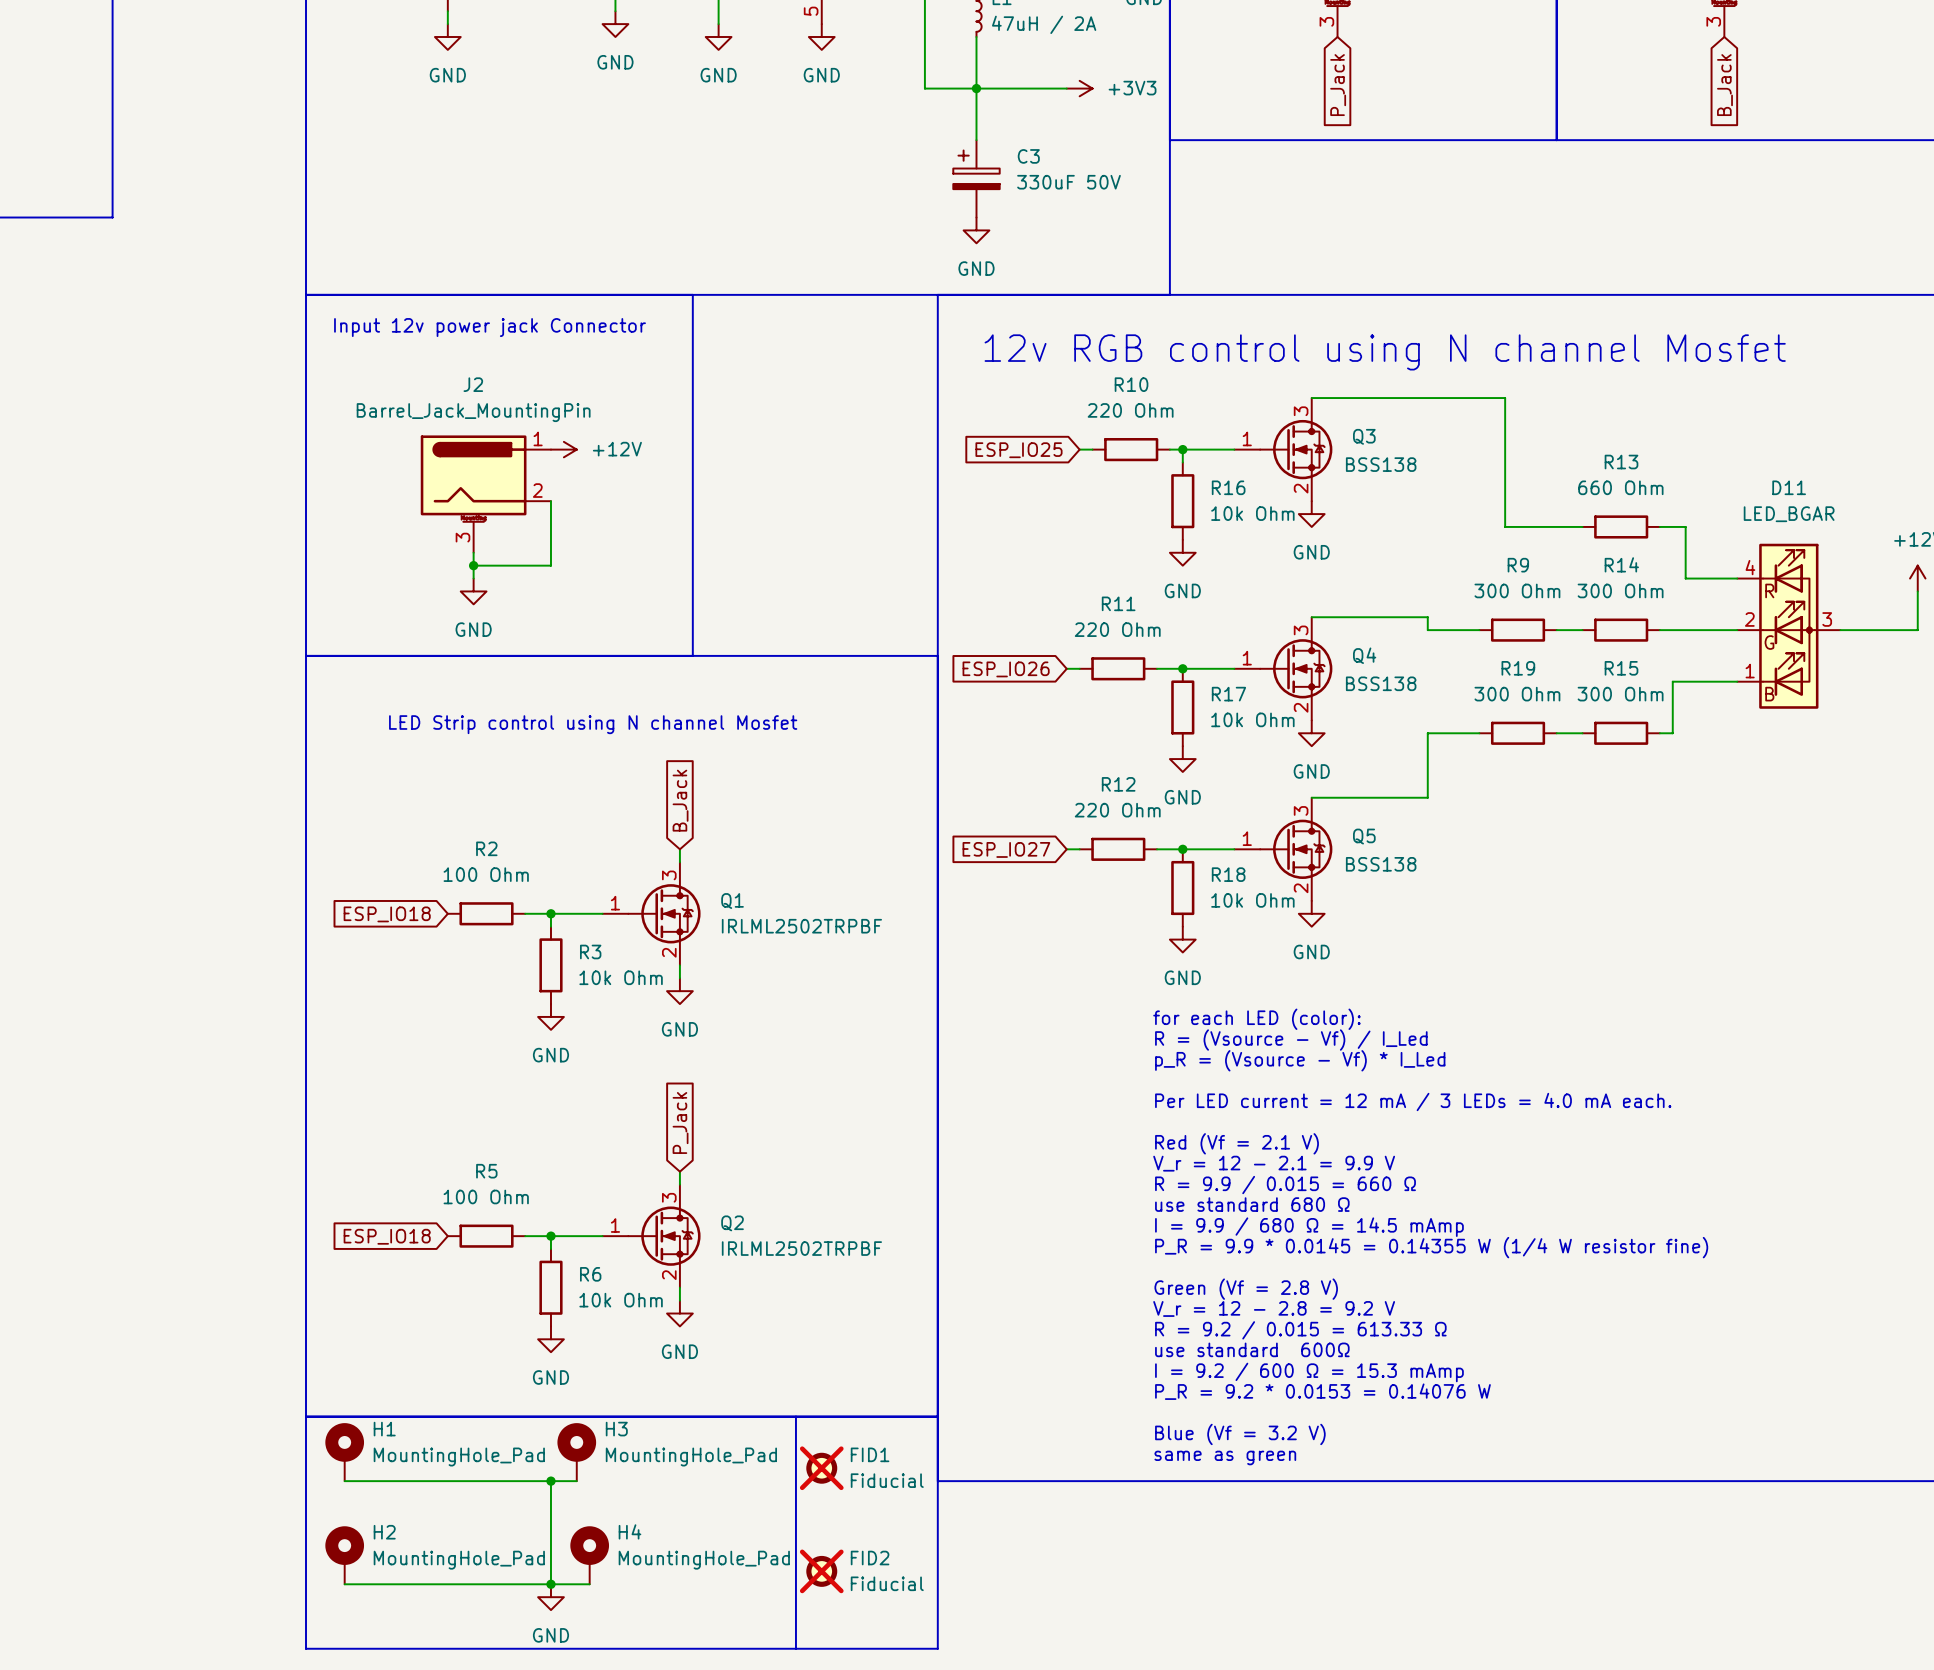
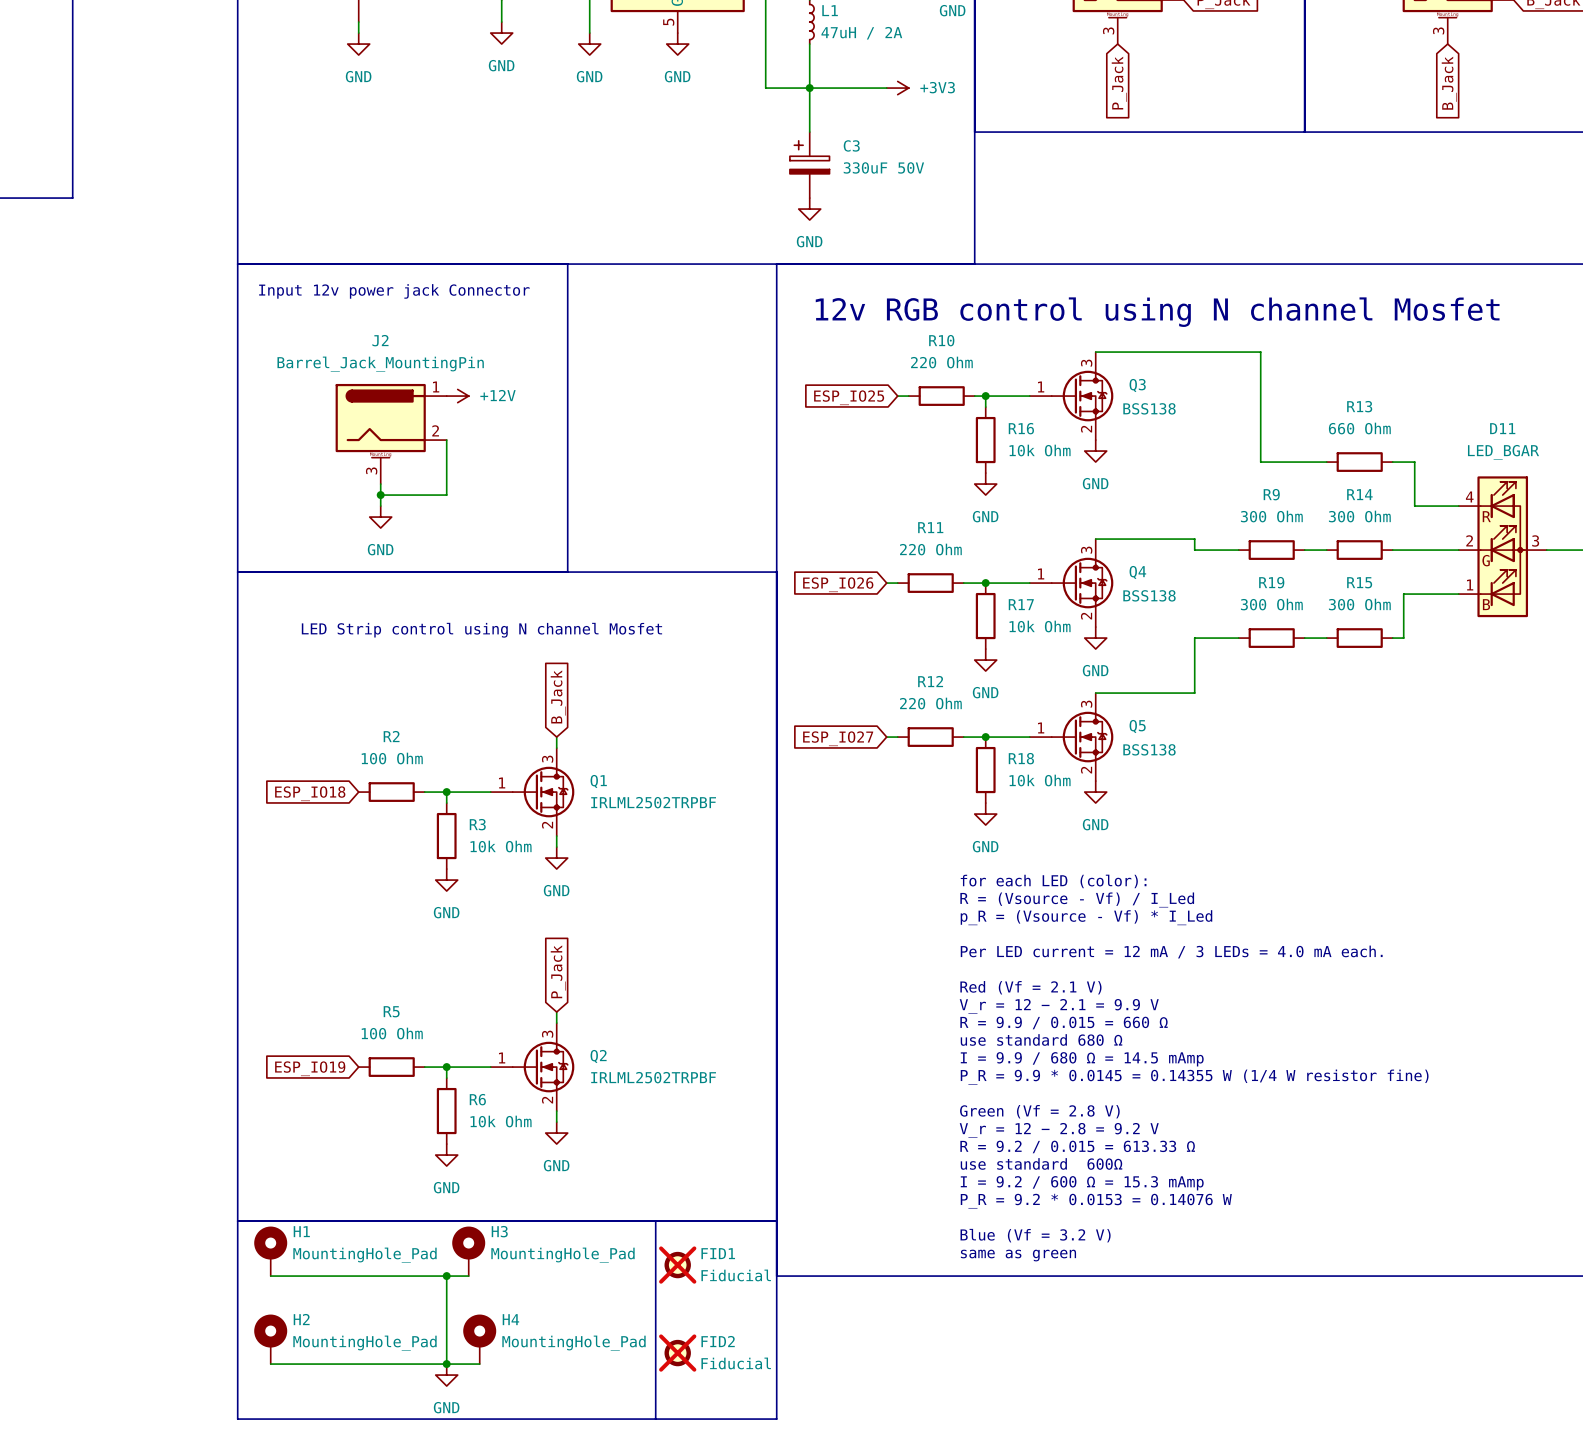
global label: ESP_IO18 (387, 1236) -> ESP_IO19 (310, 1068)

